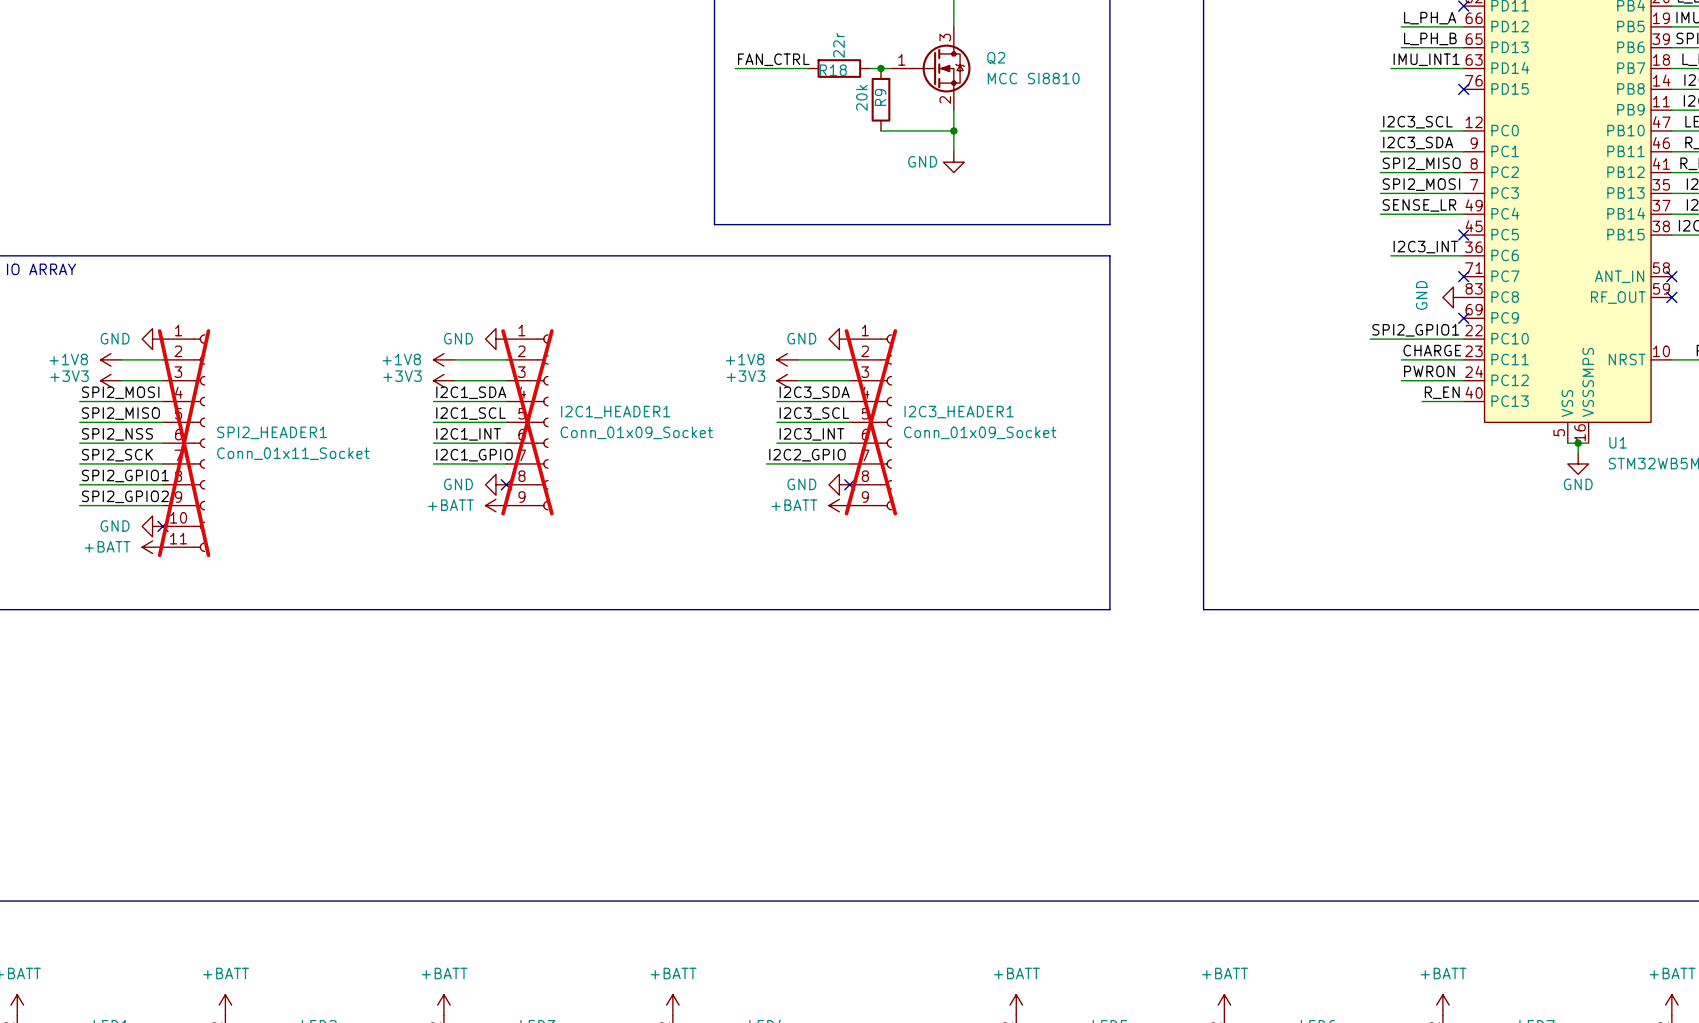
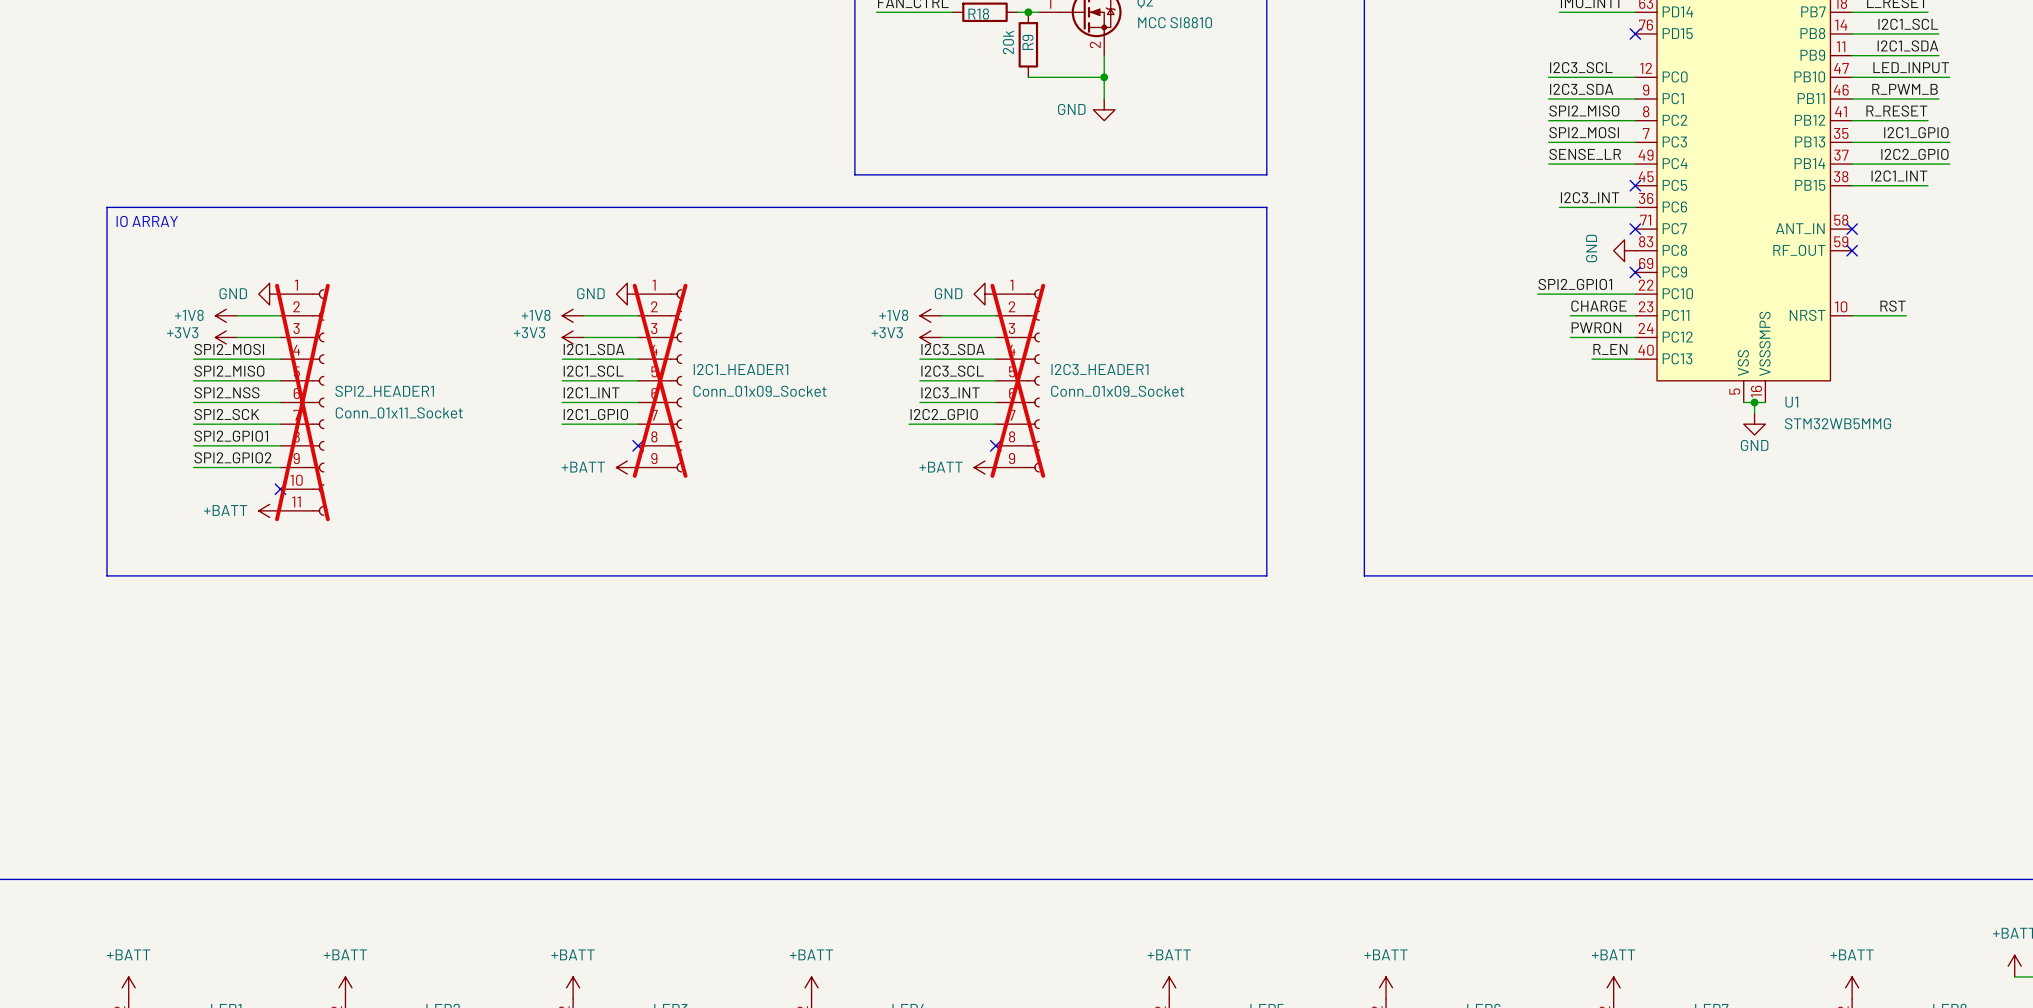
power symbol: GND (495, 484) -> none
power symbol: GND (839, 484) -> none
power symbol: GND (152, 526) -> none

